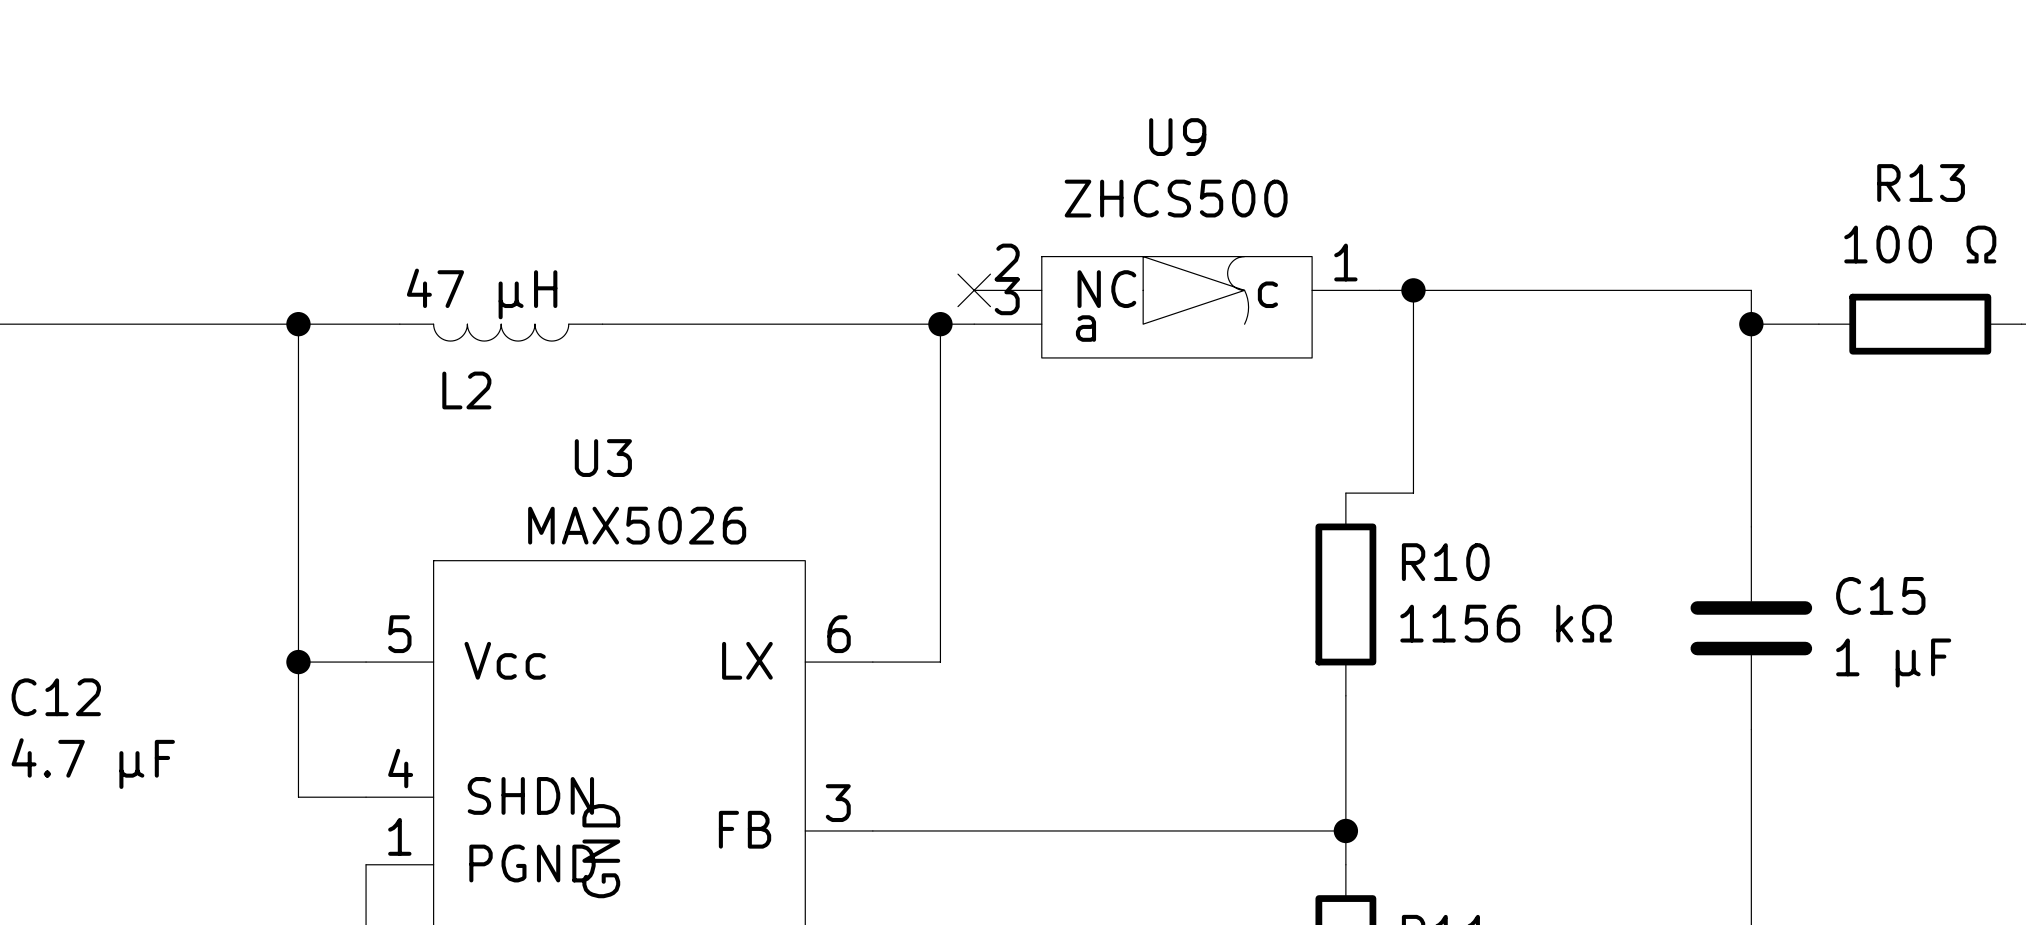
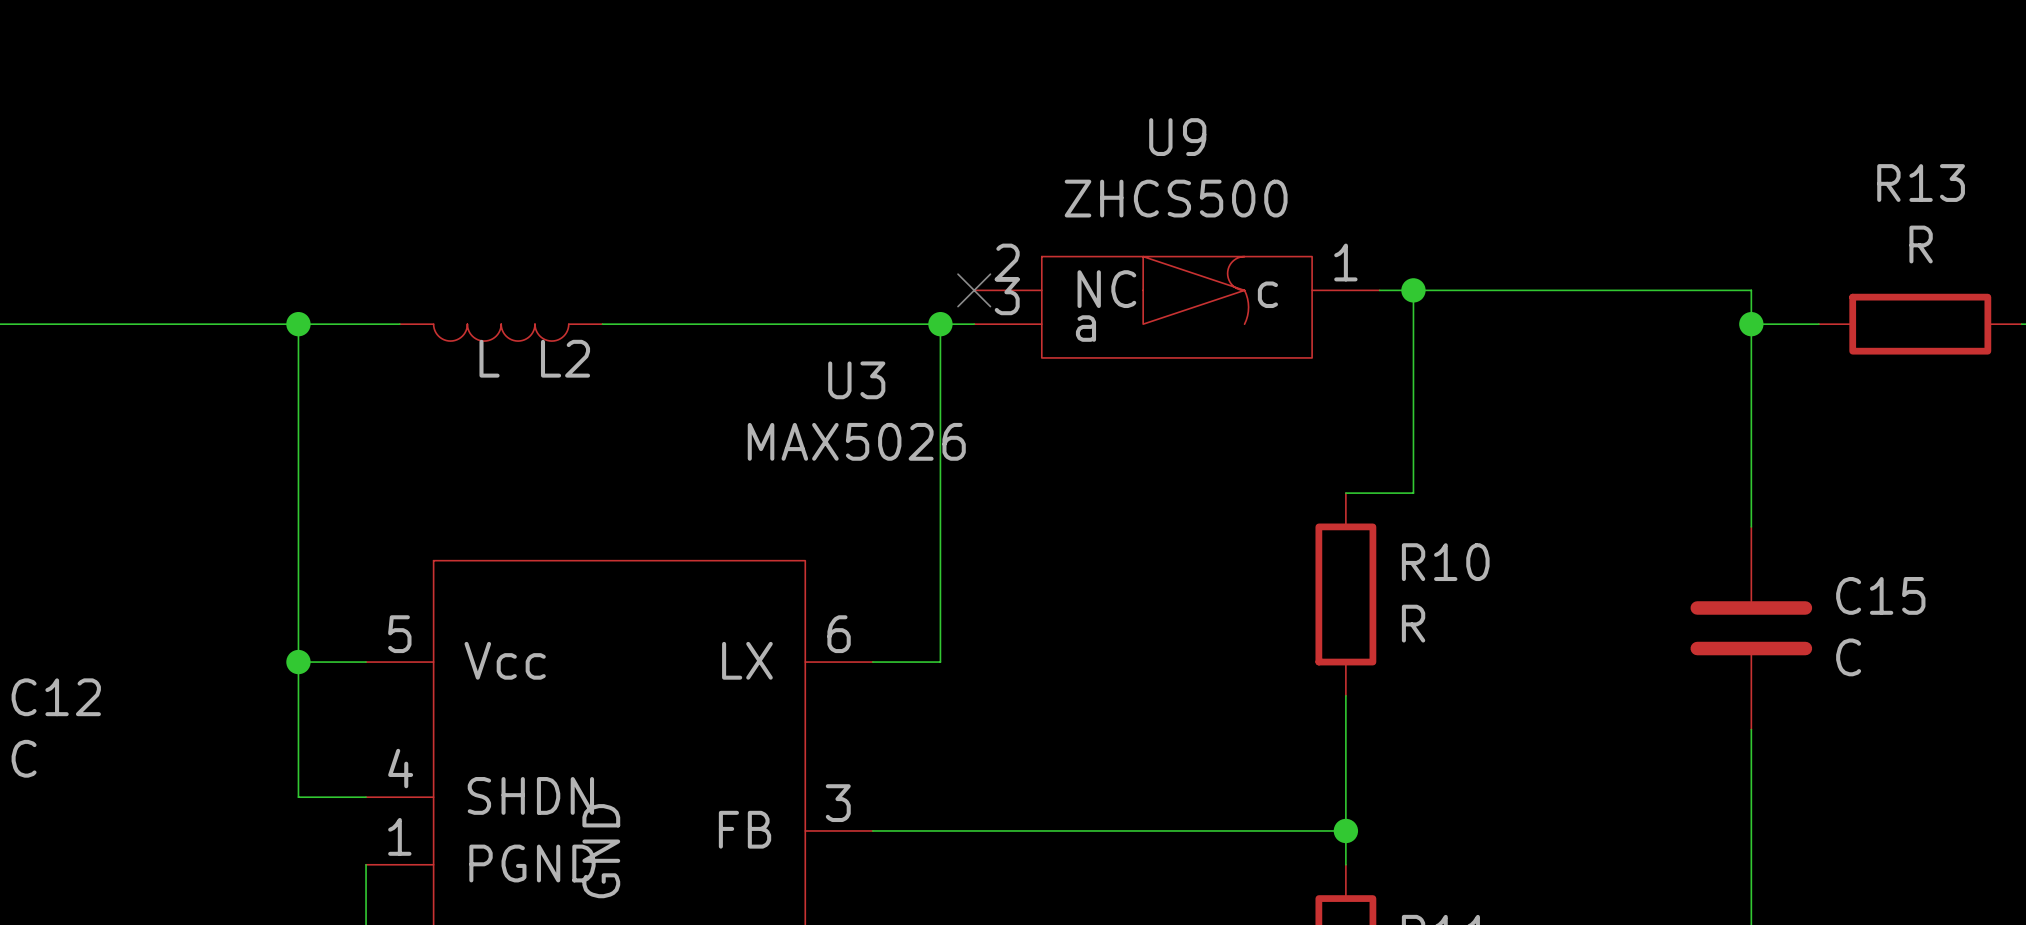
R13 value: 100 Ω (1920, 244) -> R (1921, 244)
L2 value: 47 μH (482, 293) -> L (489, 358)
L2 name position: L2 (466, 390) -> L2 (565, 358)
U3 name position: U3 (603, 458) -> U3 (856, 380)
U3 value position: MAX5026 (637, 525) -> MAX5026 (856, 441)
R10 value: 1156 kΩ (1506, 623) -> R (1413, 623)
C15 value: 1 μF (1893, 663) -> C (1848, 657)
C12 value: 4.7 μF (93, 763) -> C (24, 758)

